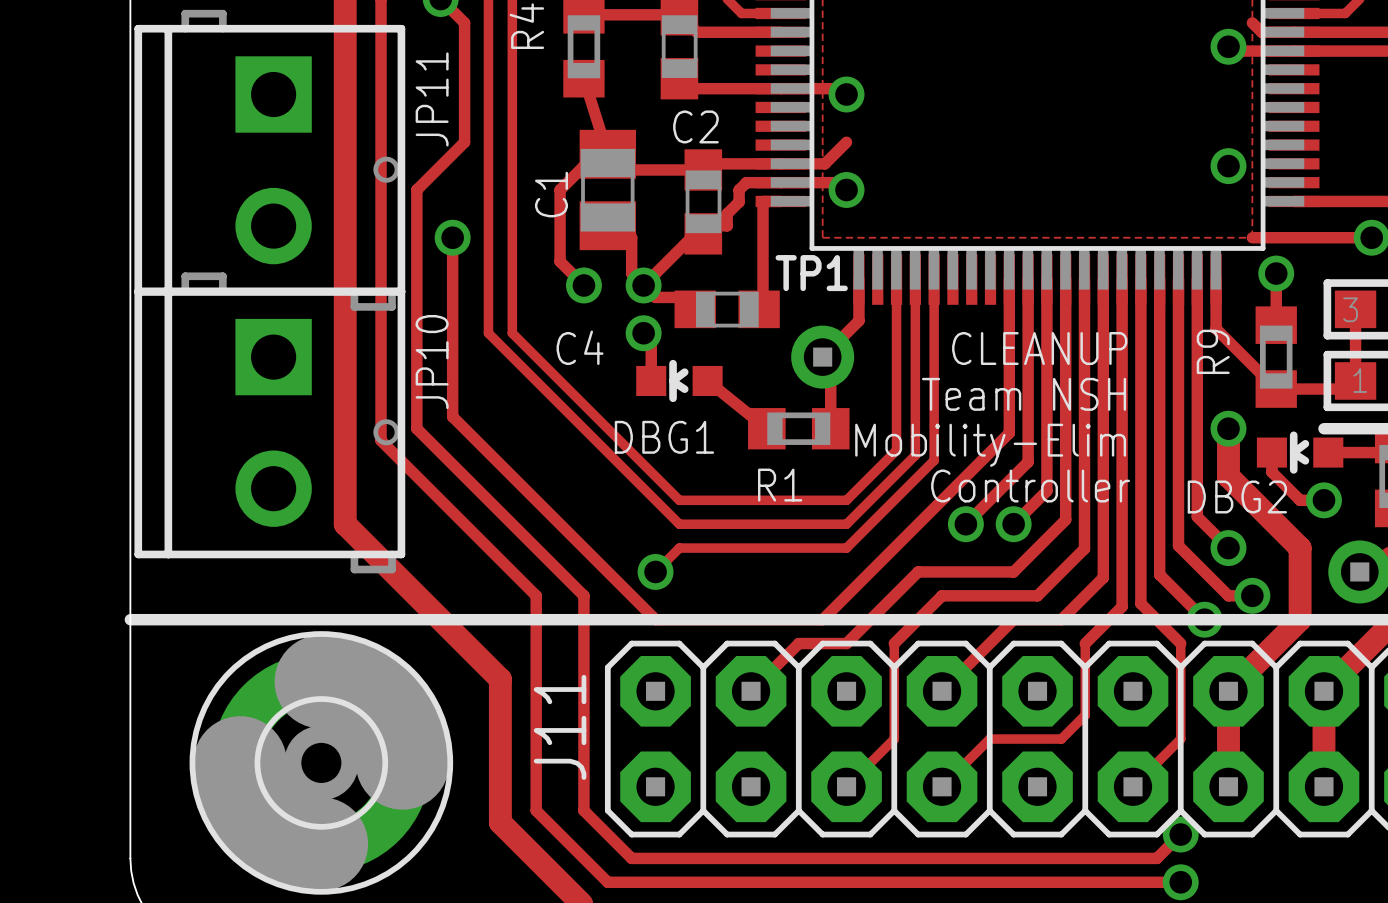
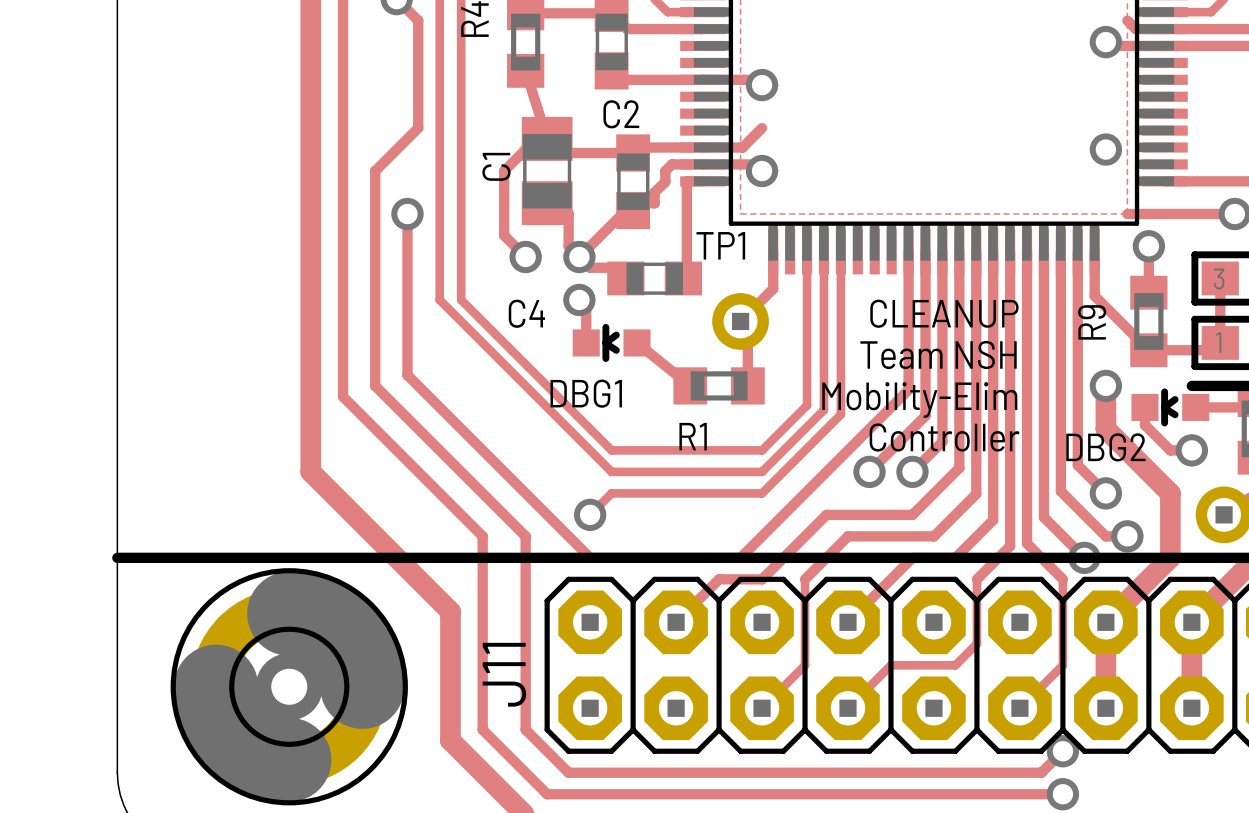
JP11: (269, 160) -> none
JP10: (269, 422) -> none

